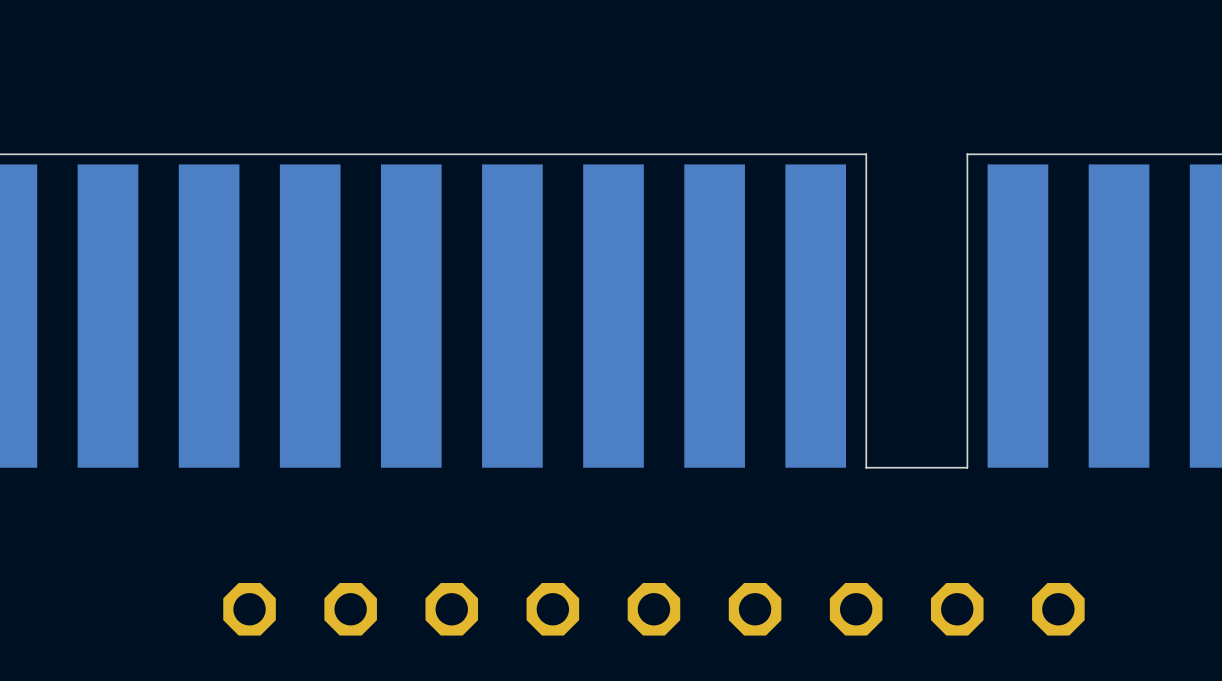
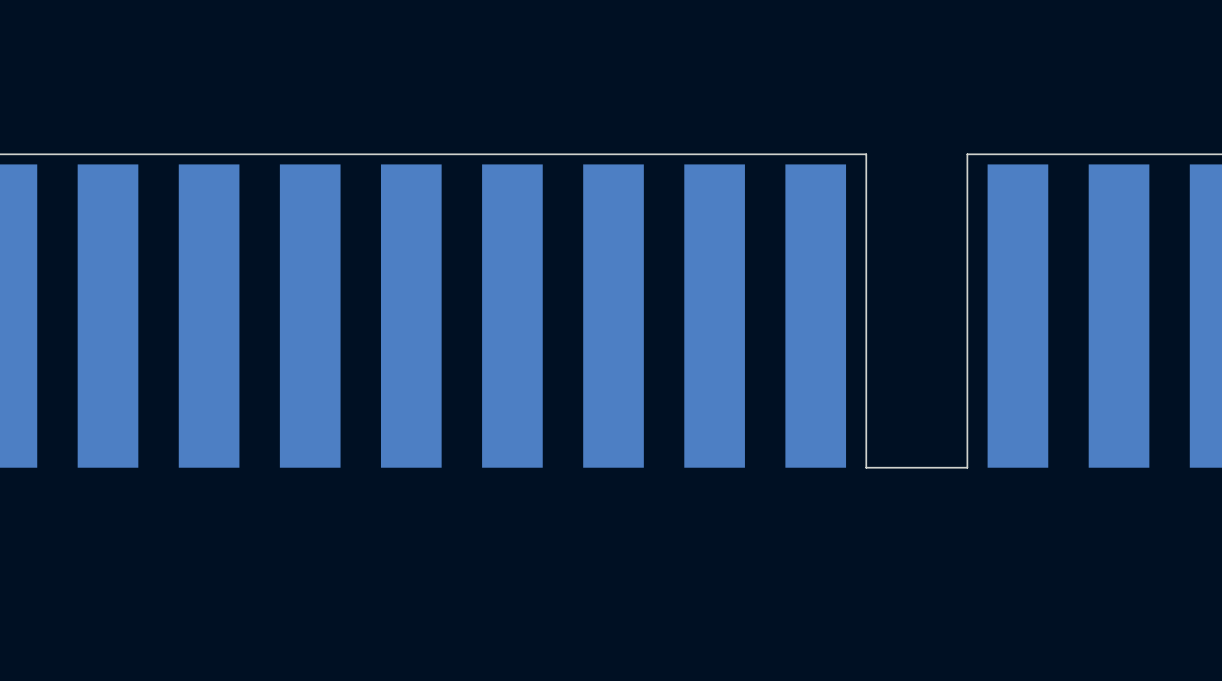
part: (653, 609) -> none

